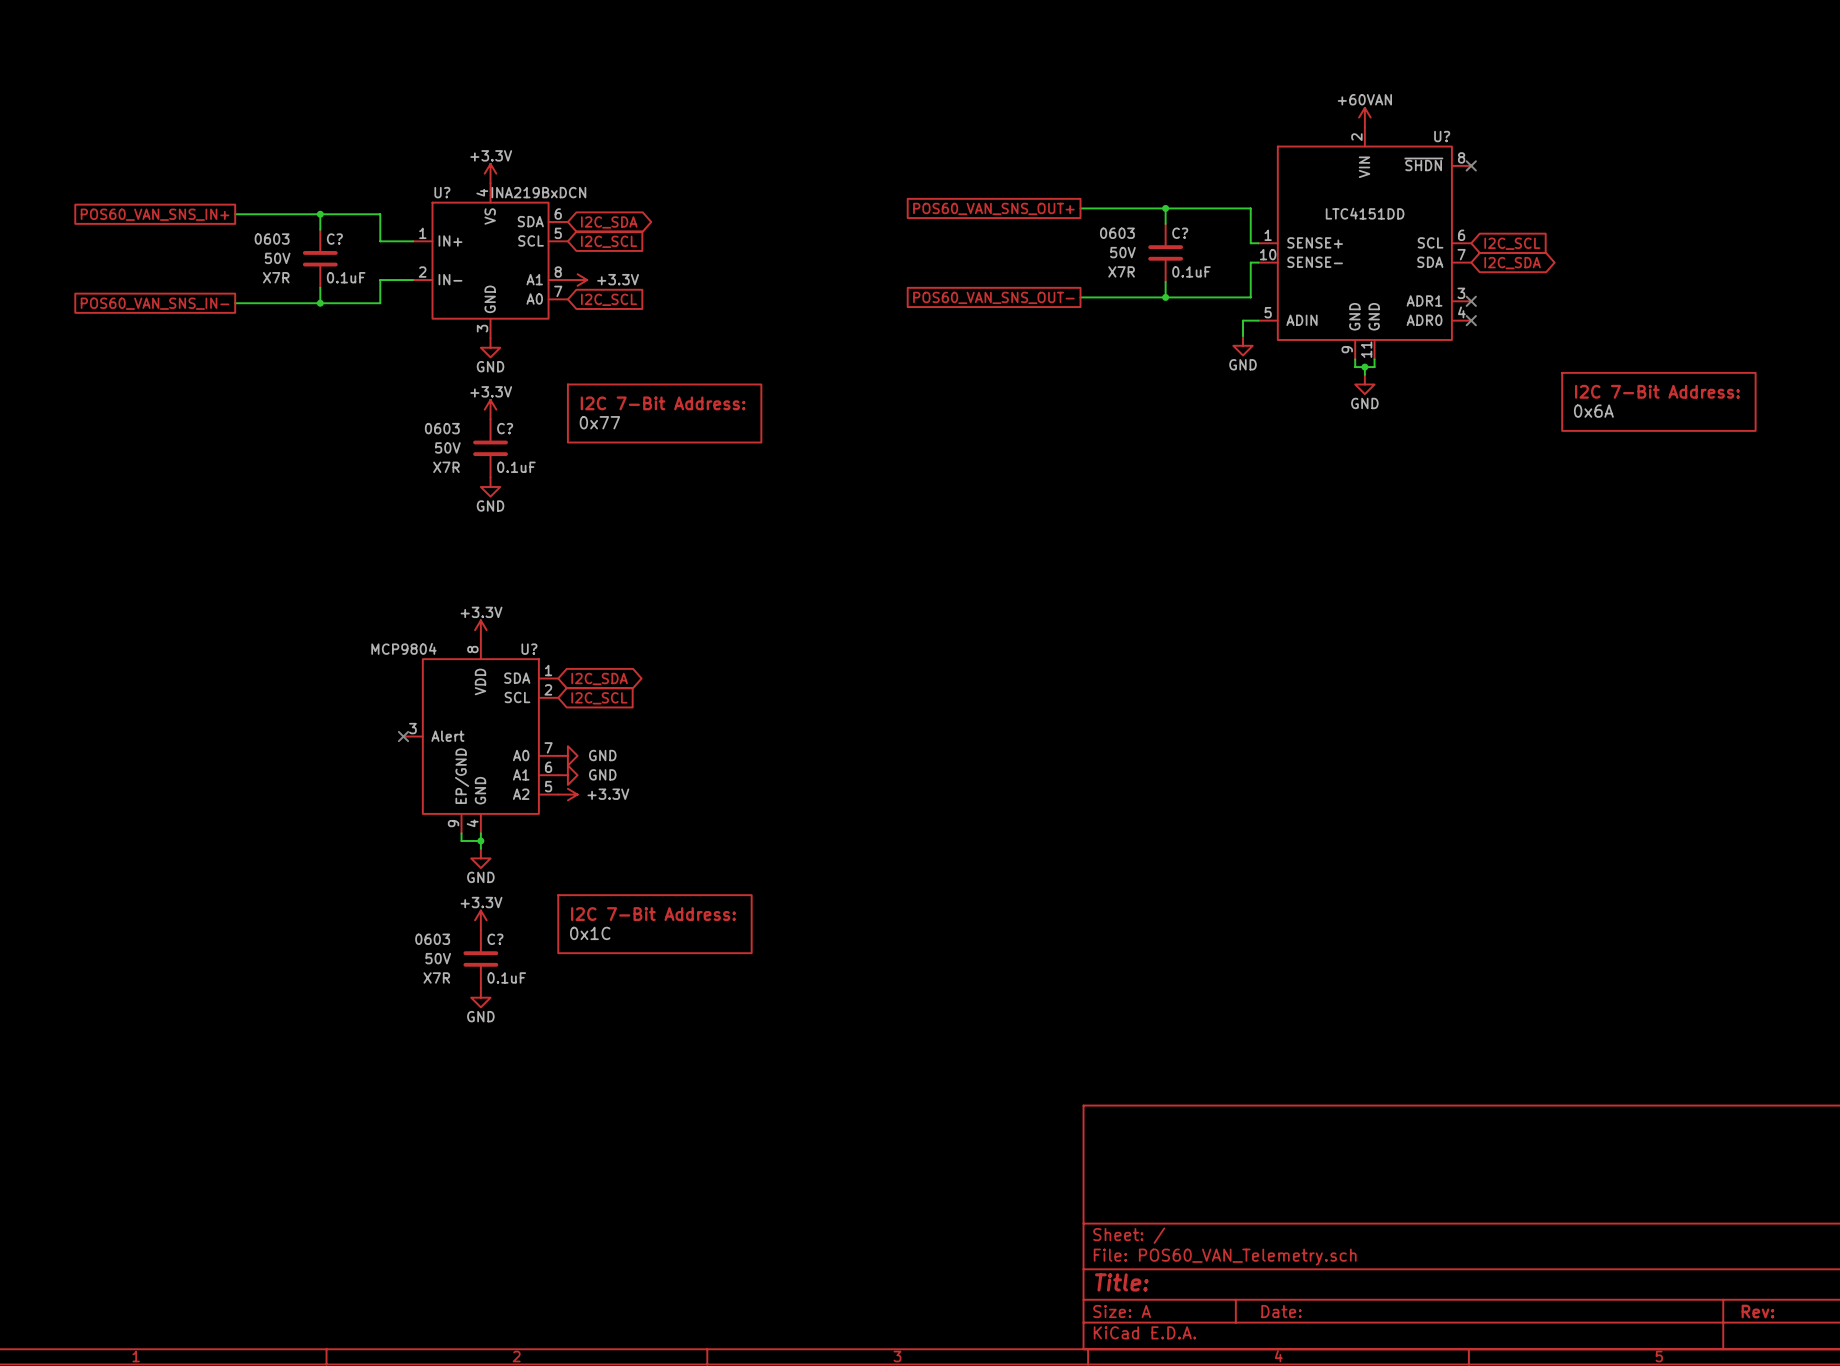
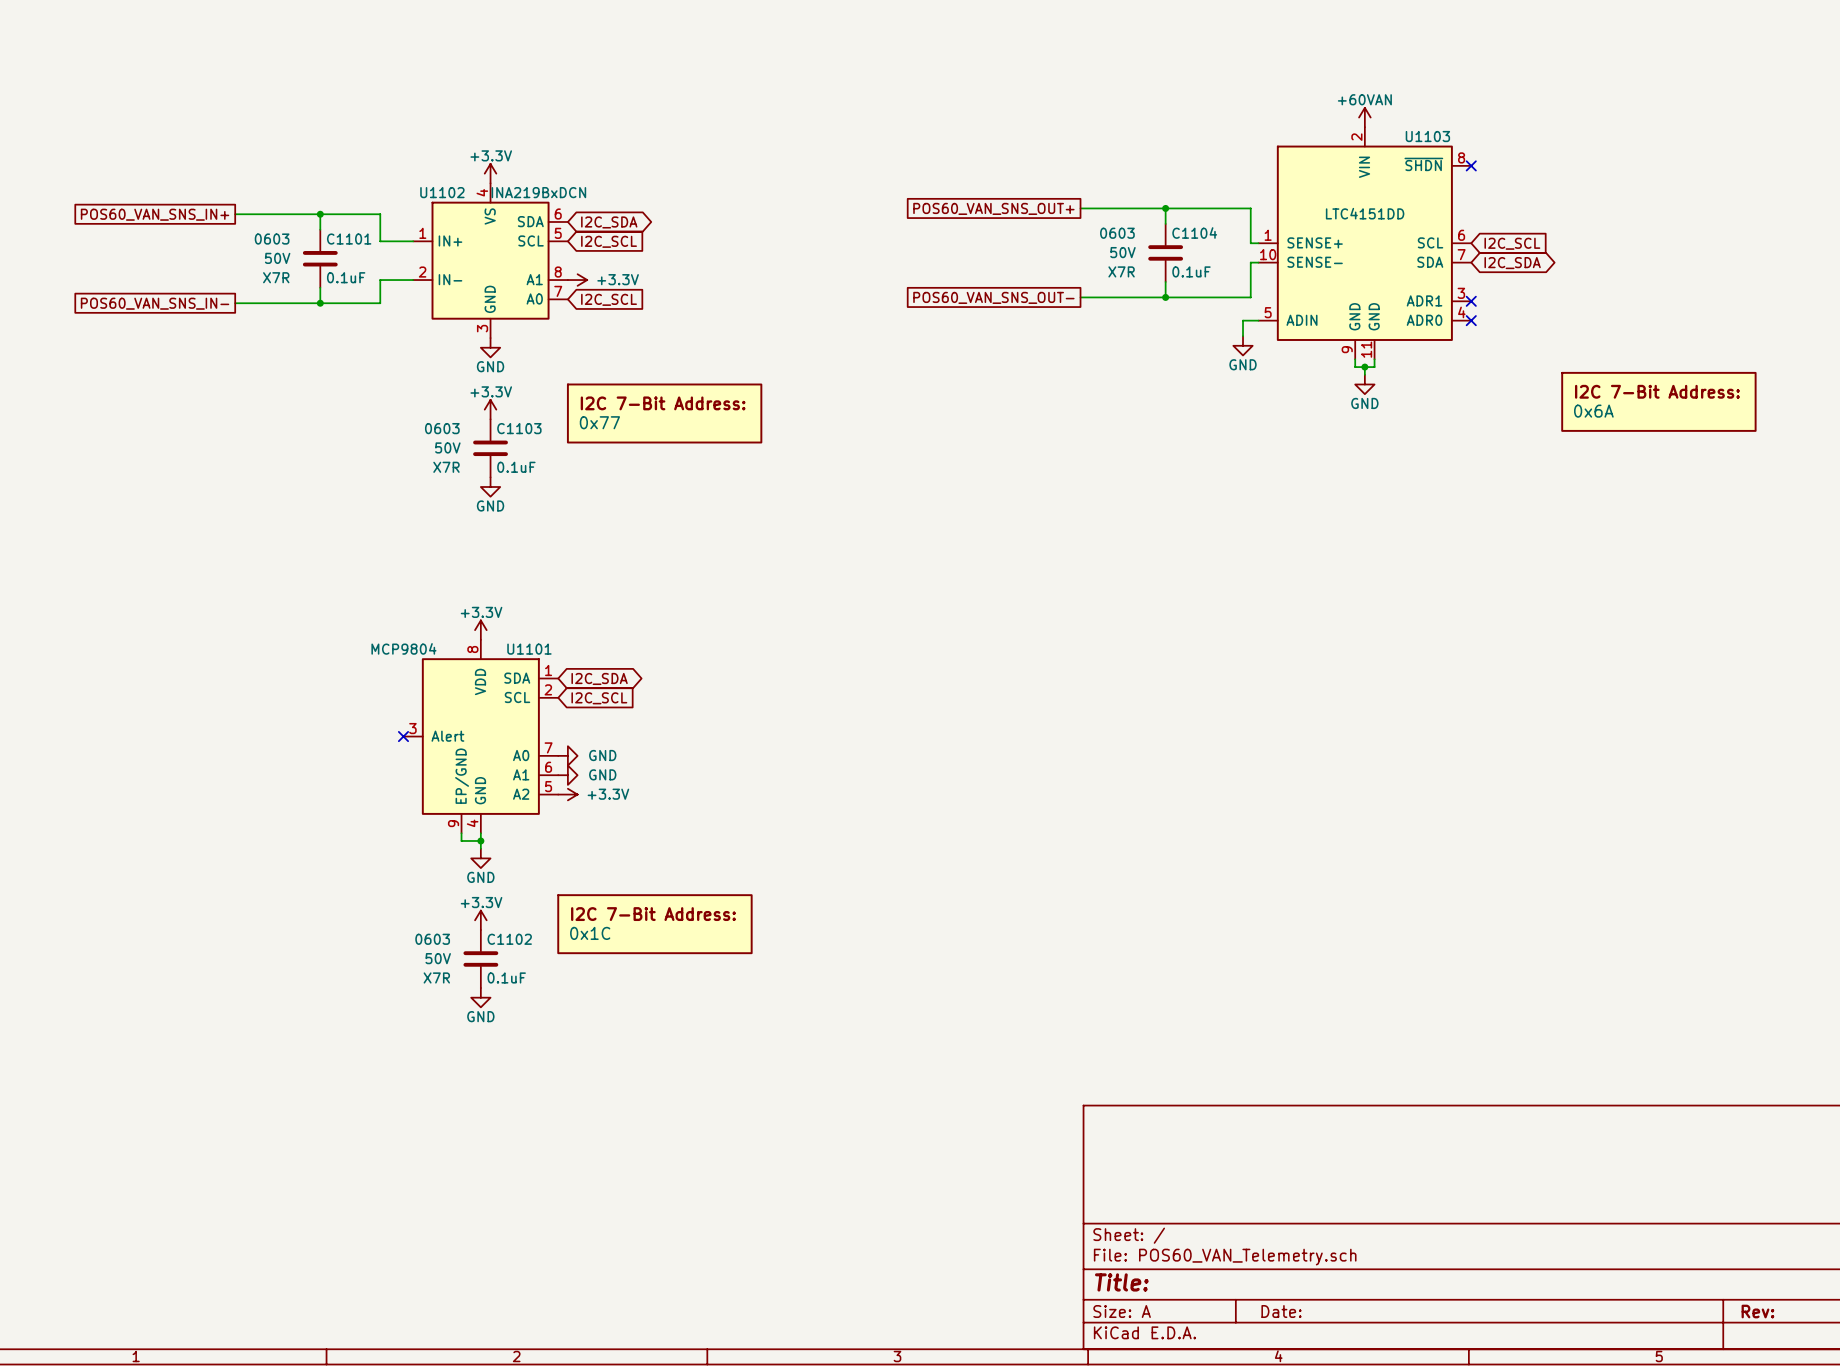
U? name: U? (1442, 136) -> U1103 (1427, 136)
U? name: U? (442, 192) -> U1102 (442, 192)
C? name: C? (1180, 233) -> C1104 (1194, 233)
C? name: C? (334, 239) -> C1101 (349, 239)
C? name: C? (505, 428) -> C1103 (519, 428)
U? name: U? (529, 649) -> U1101 (529, 649)
C? name: C? (495, 939) -> C1102 (509, 939)

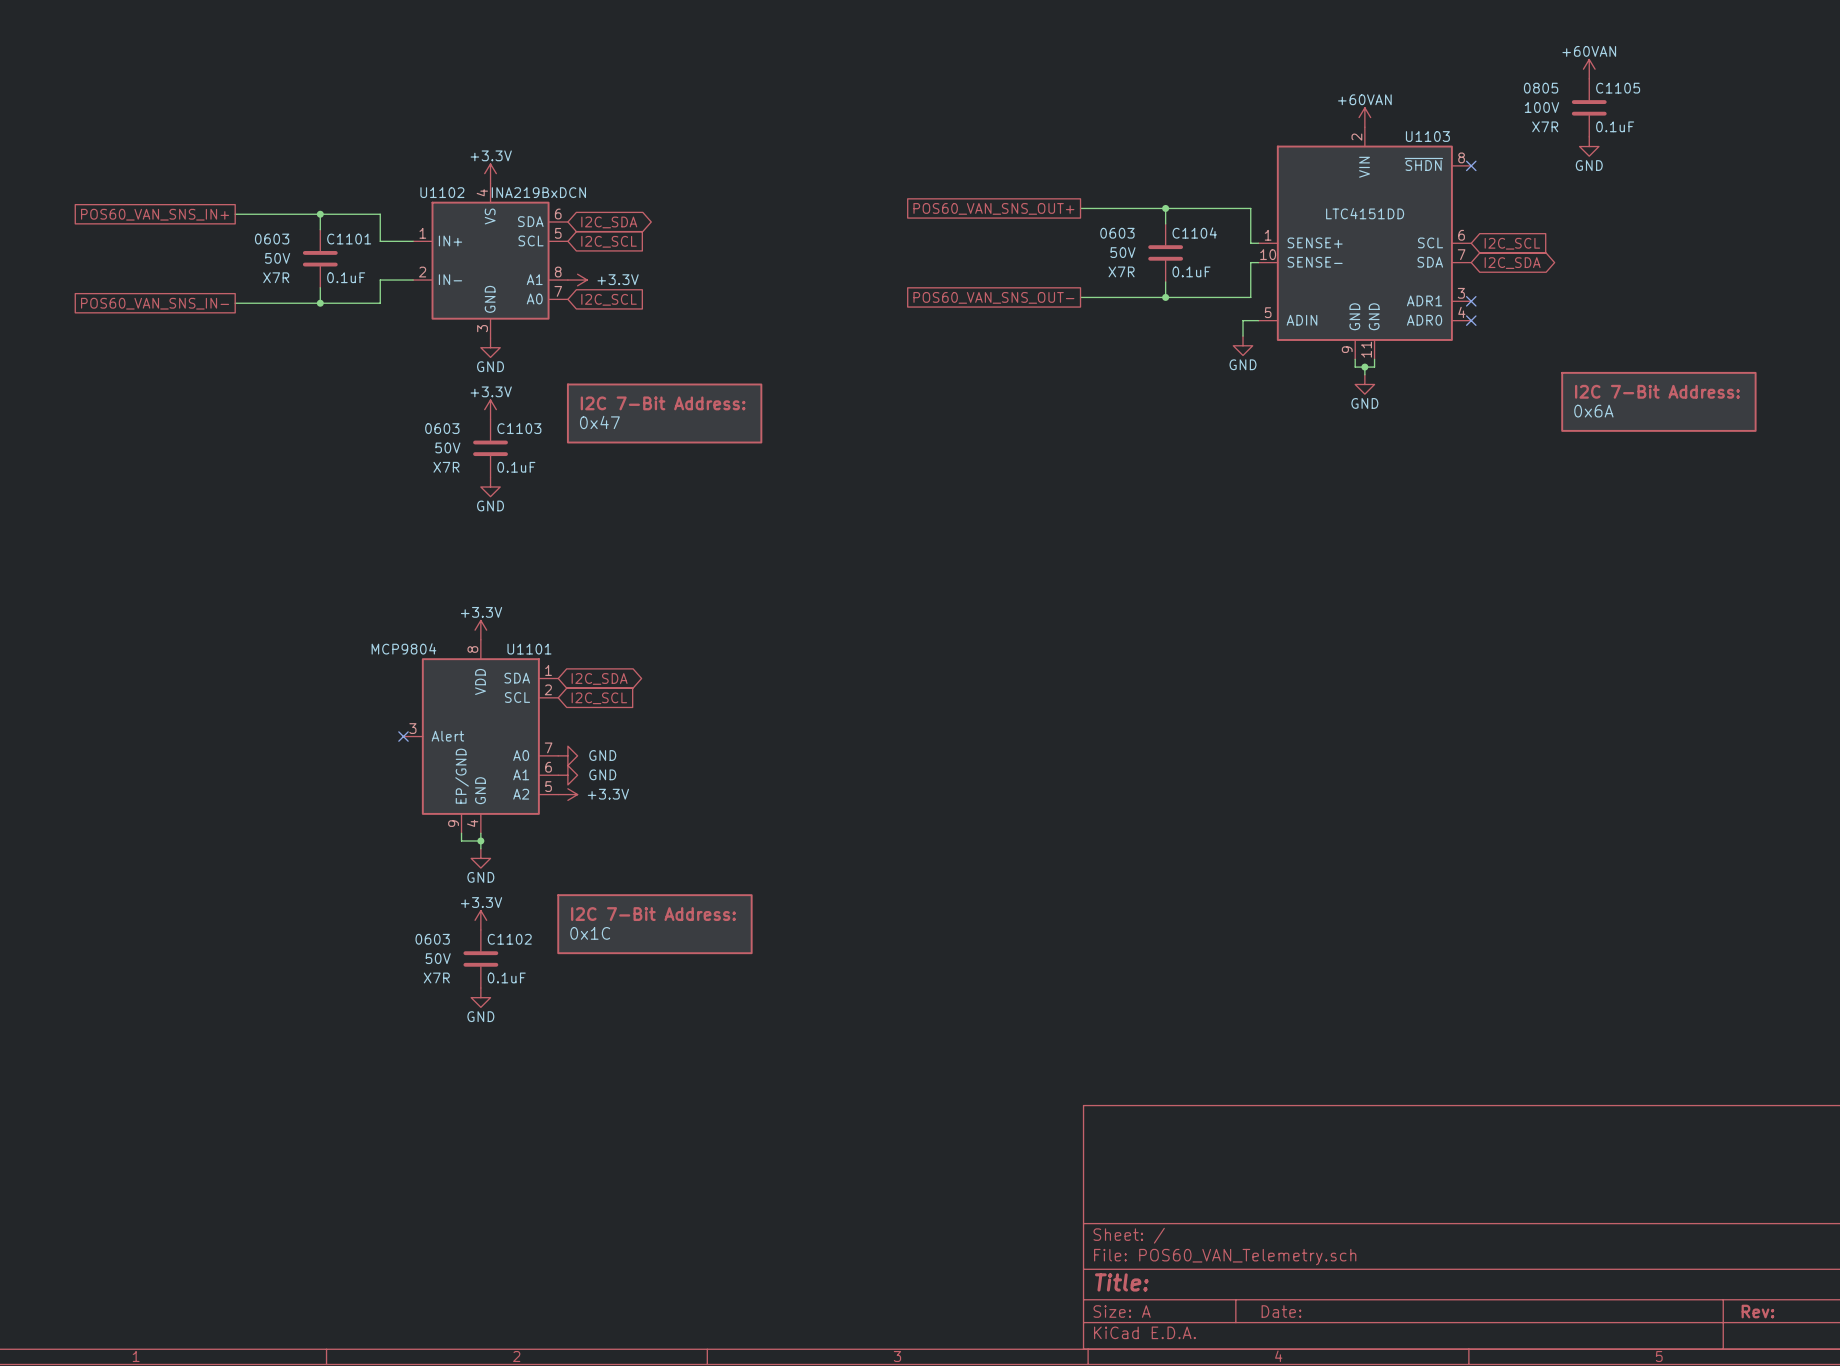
power symbol: none -> +60VAN (1589, 69)
C1105: none -> 0.1uF (1589, 107)
power symbol: none -> GND (1589, 146)
part value: 0x77 (599, 422) -> 0x47 (599, 422)

